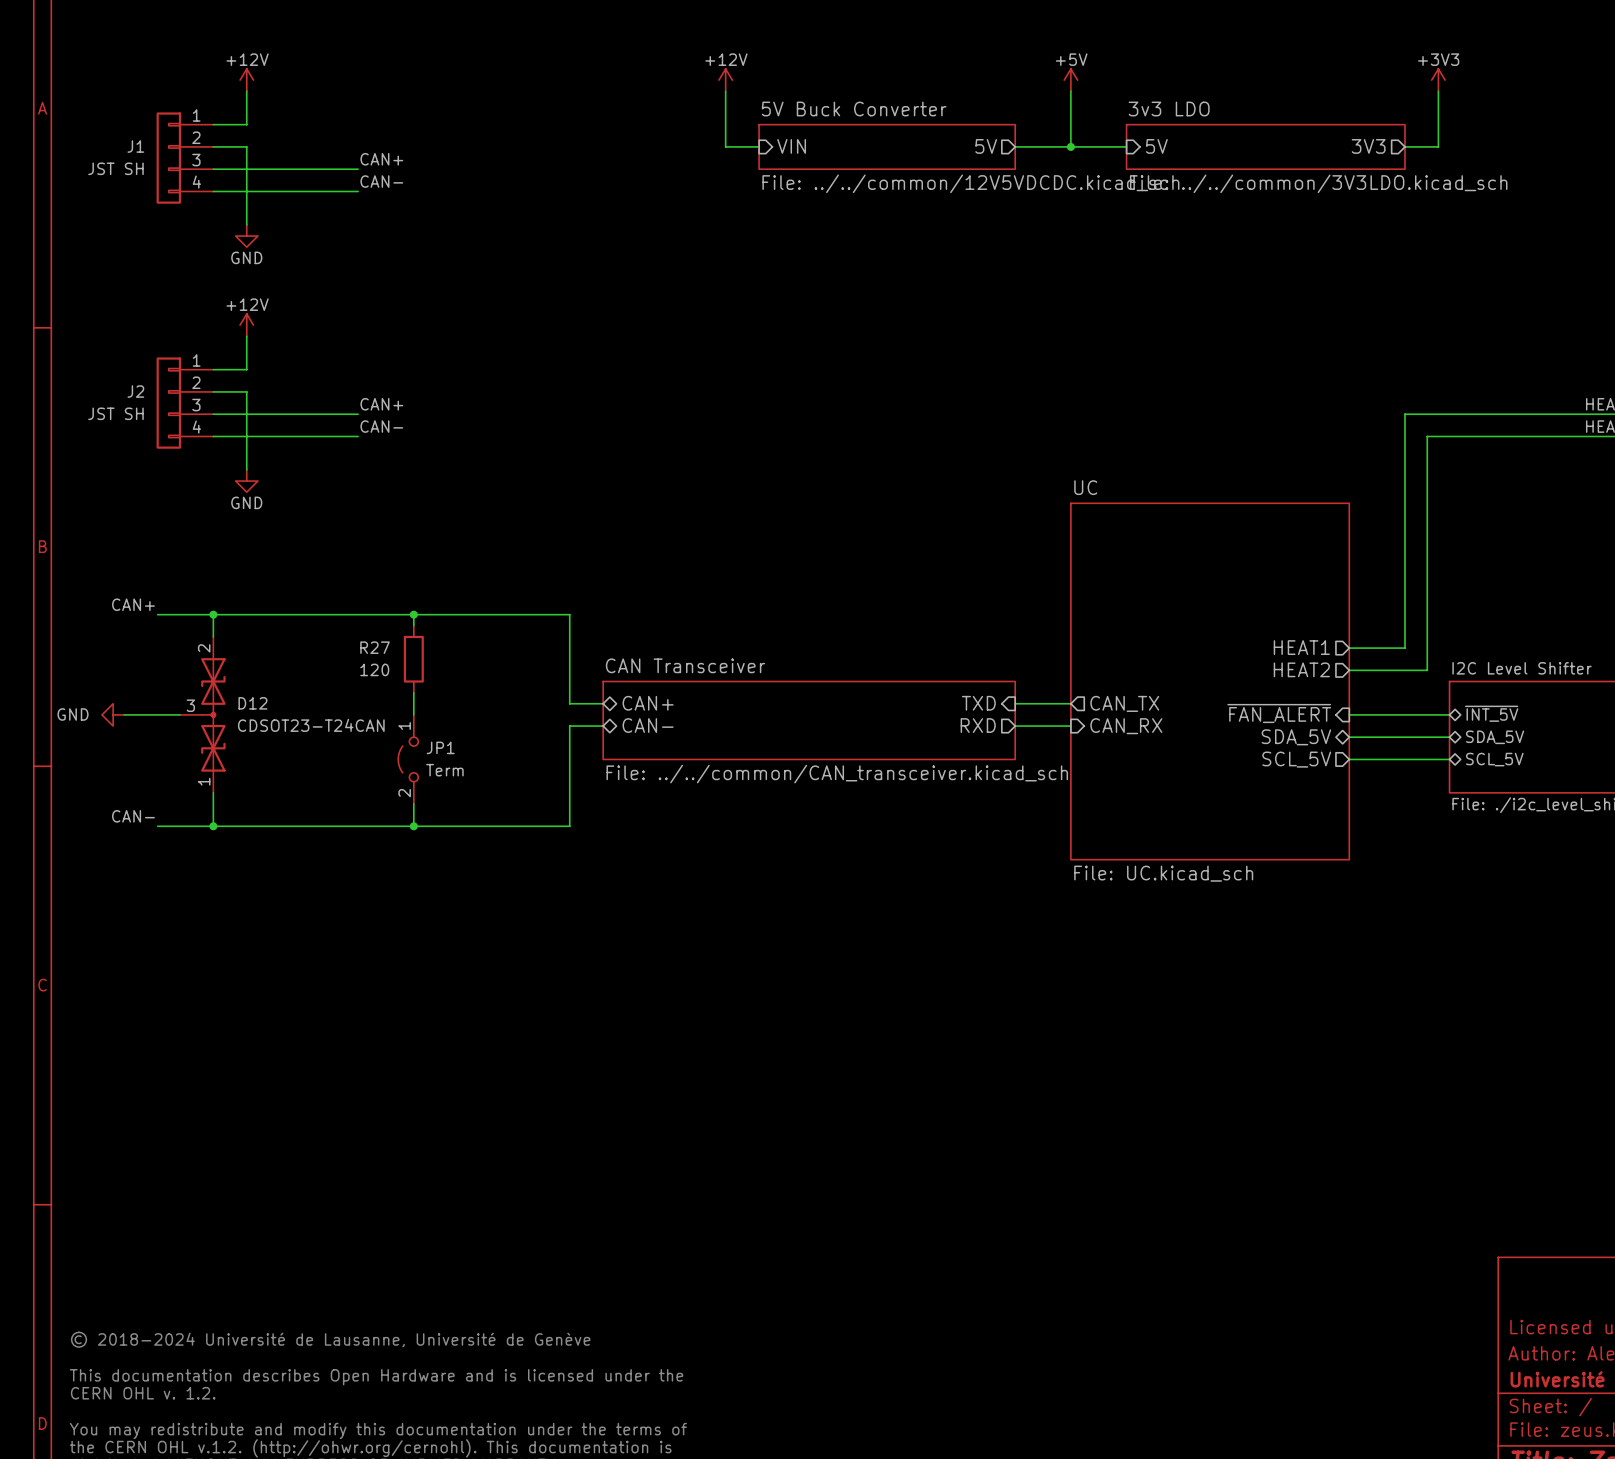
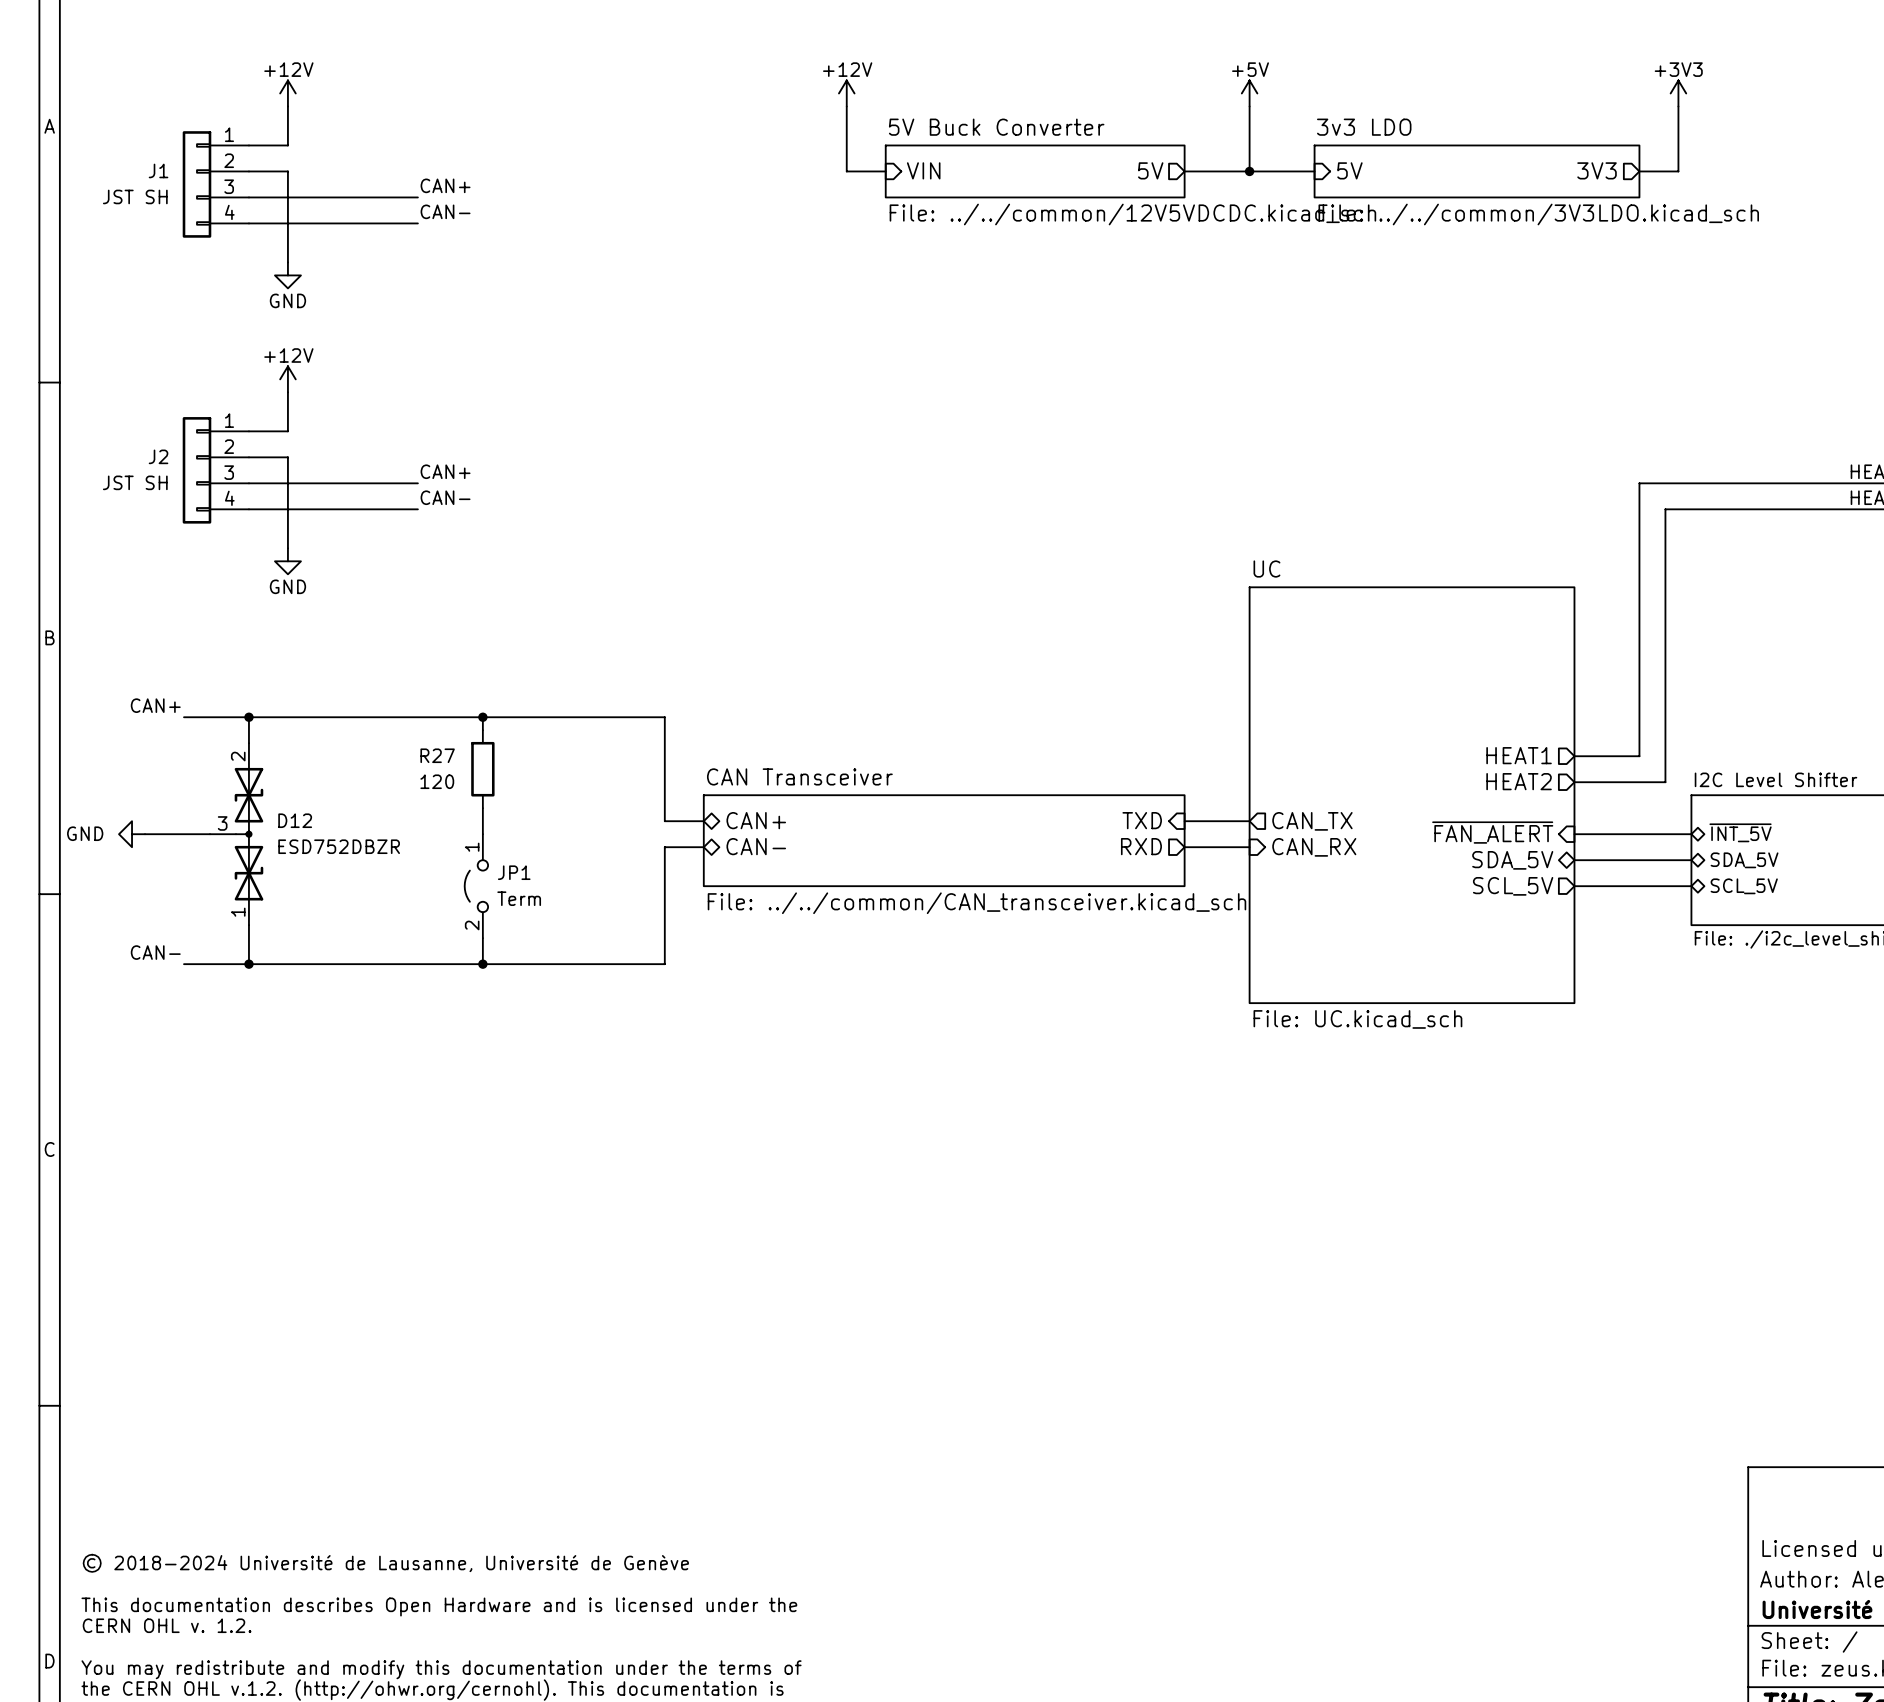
D12 value: CDSOT23-T24CAN (311, 725) -> ESD752DBZR (339, 846)

